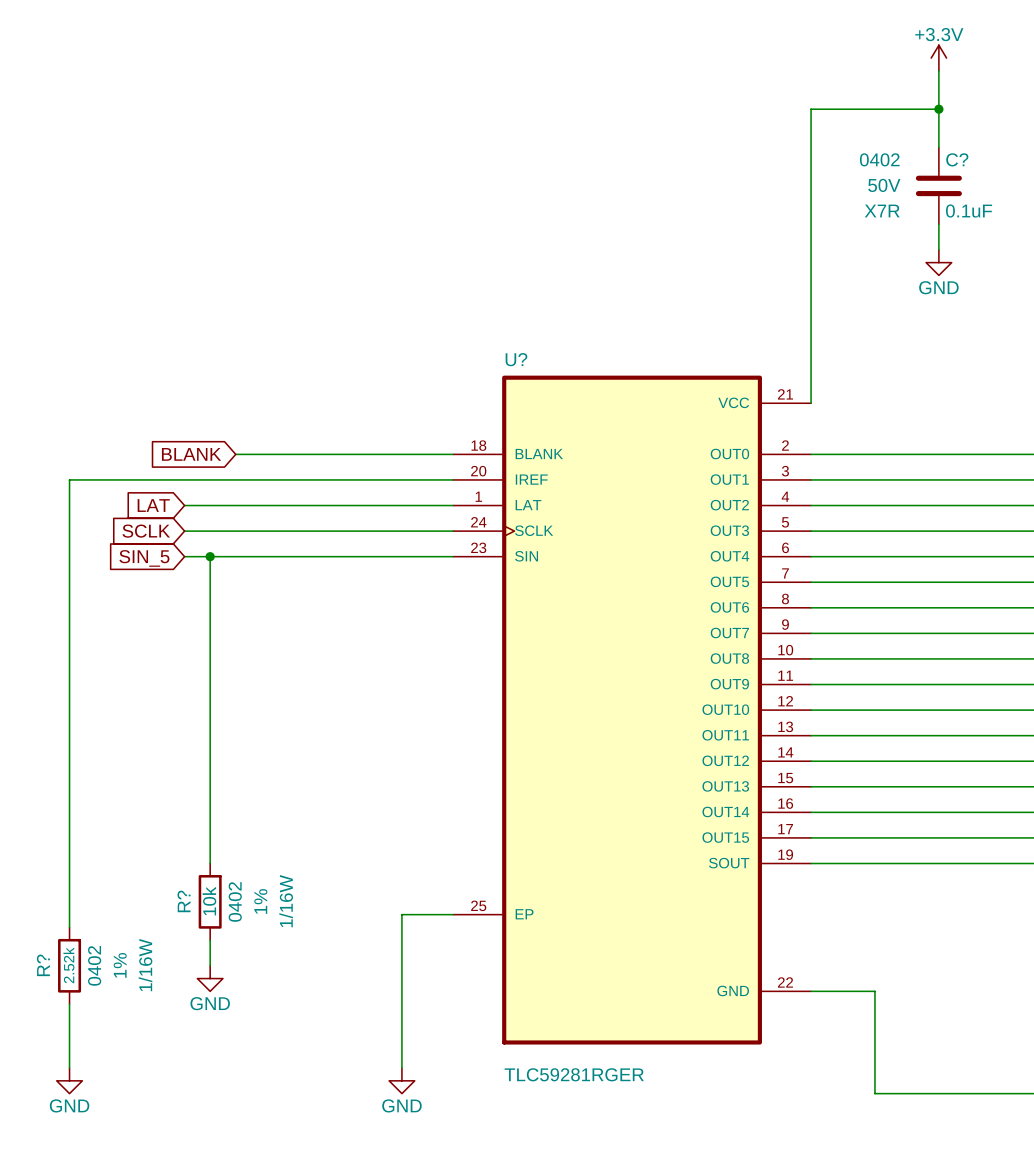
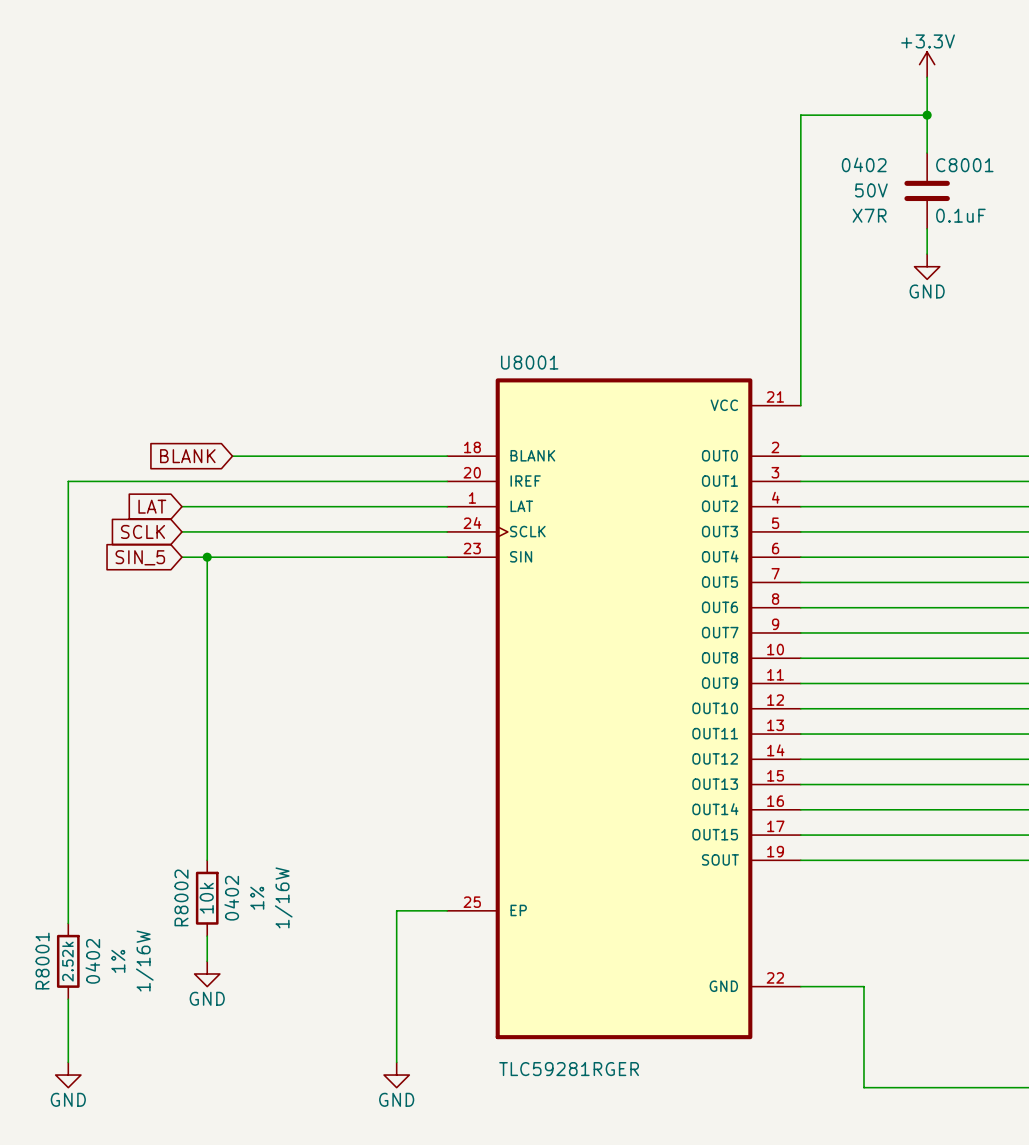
C? name: C? (957, 159) -> C8001 (964, 165)
U? name: U? (516, 359) -> U8001 (529, 362)
R? name: R? (184, 901) -> R8002 (181, 897)
R? name: R? (43, 965) -> R8001 (42, 961)

